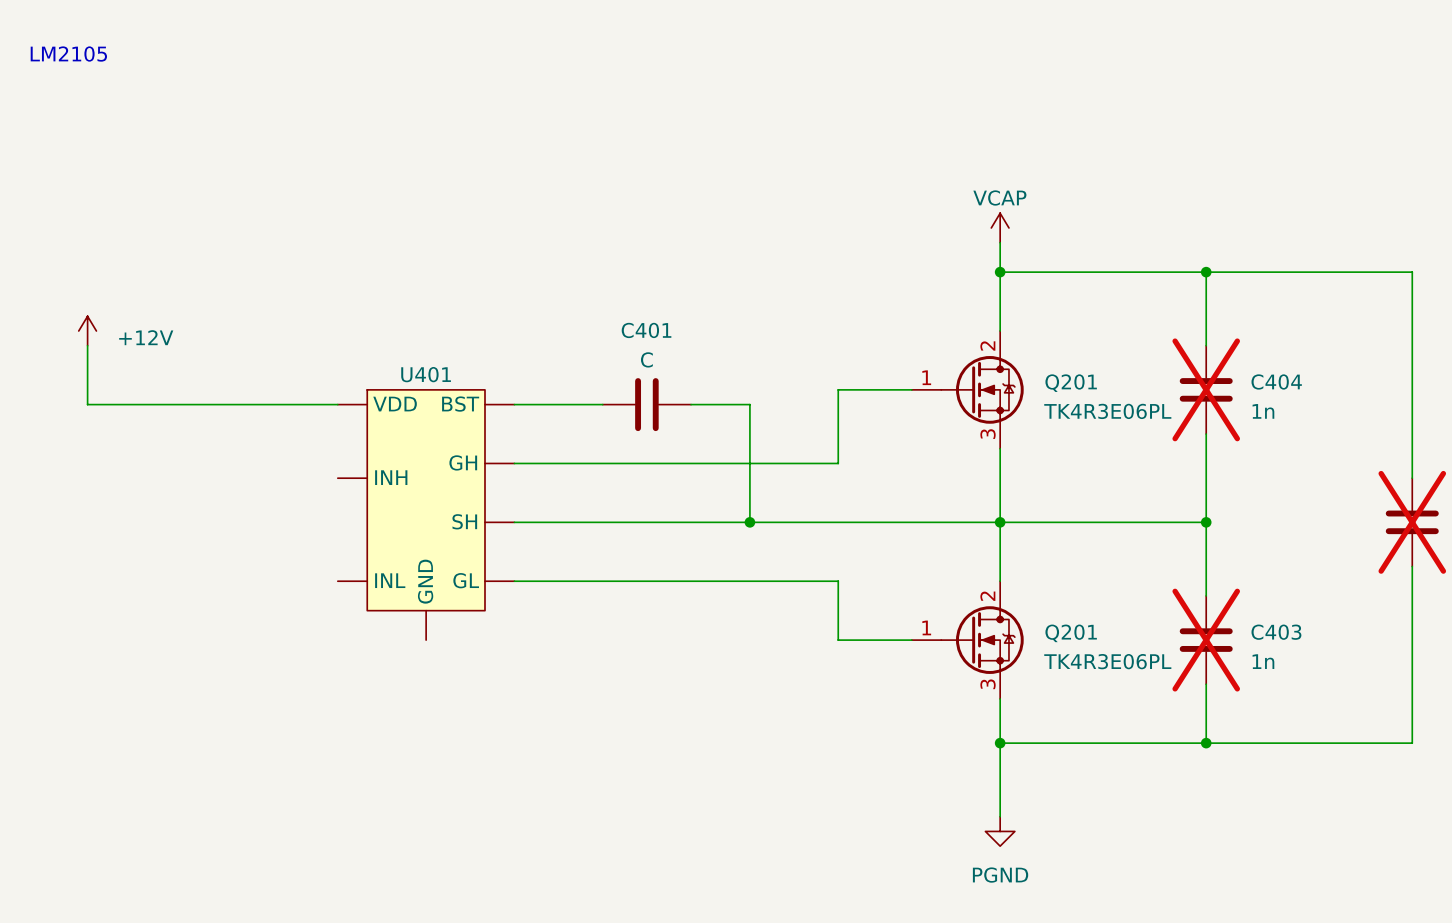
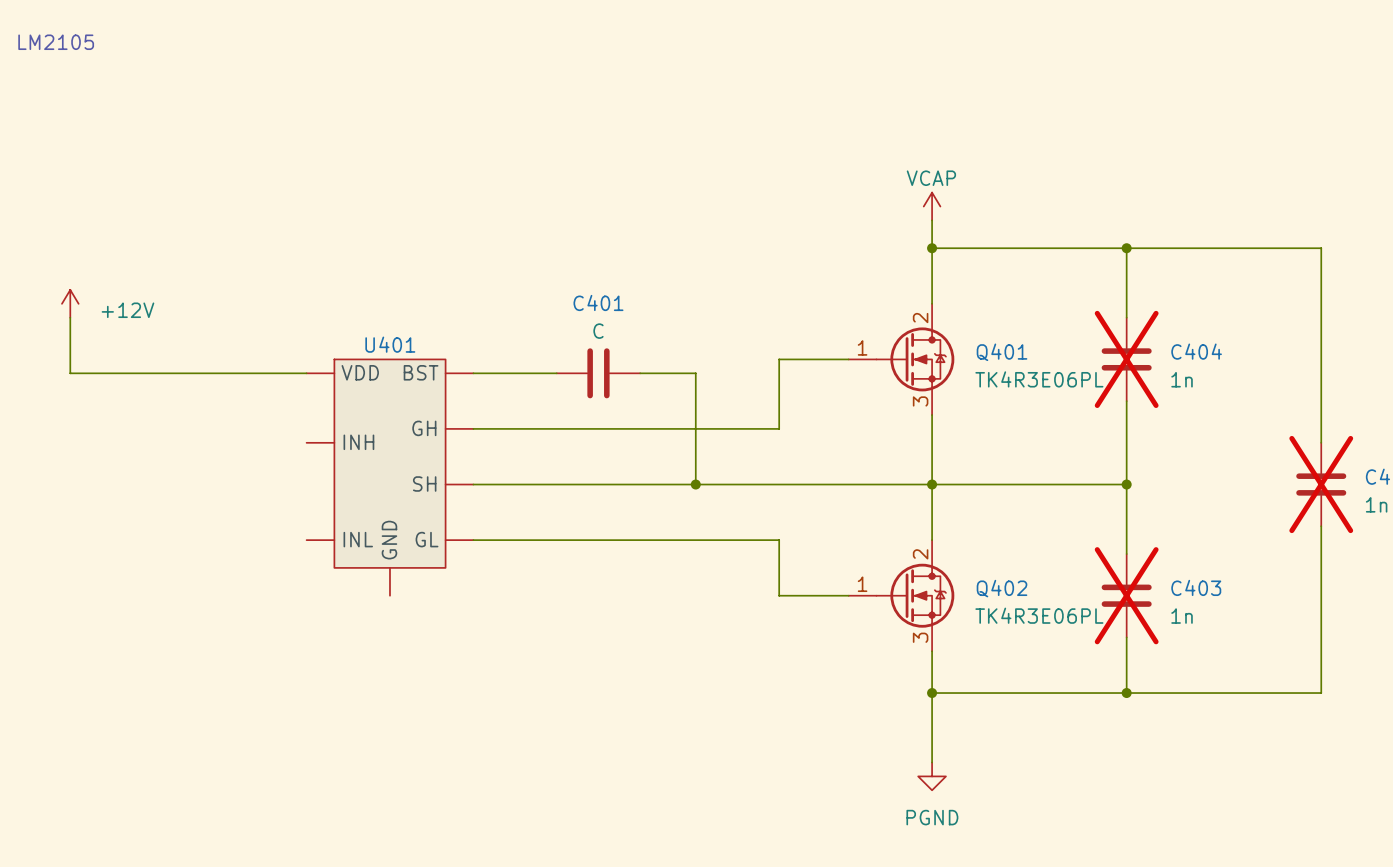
Q201 name: Q201 (1071, 383) -> Q401 (1002, 352)
Q201 name: Q201 (1071, 633) -> Q402 (1002, 588)

